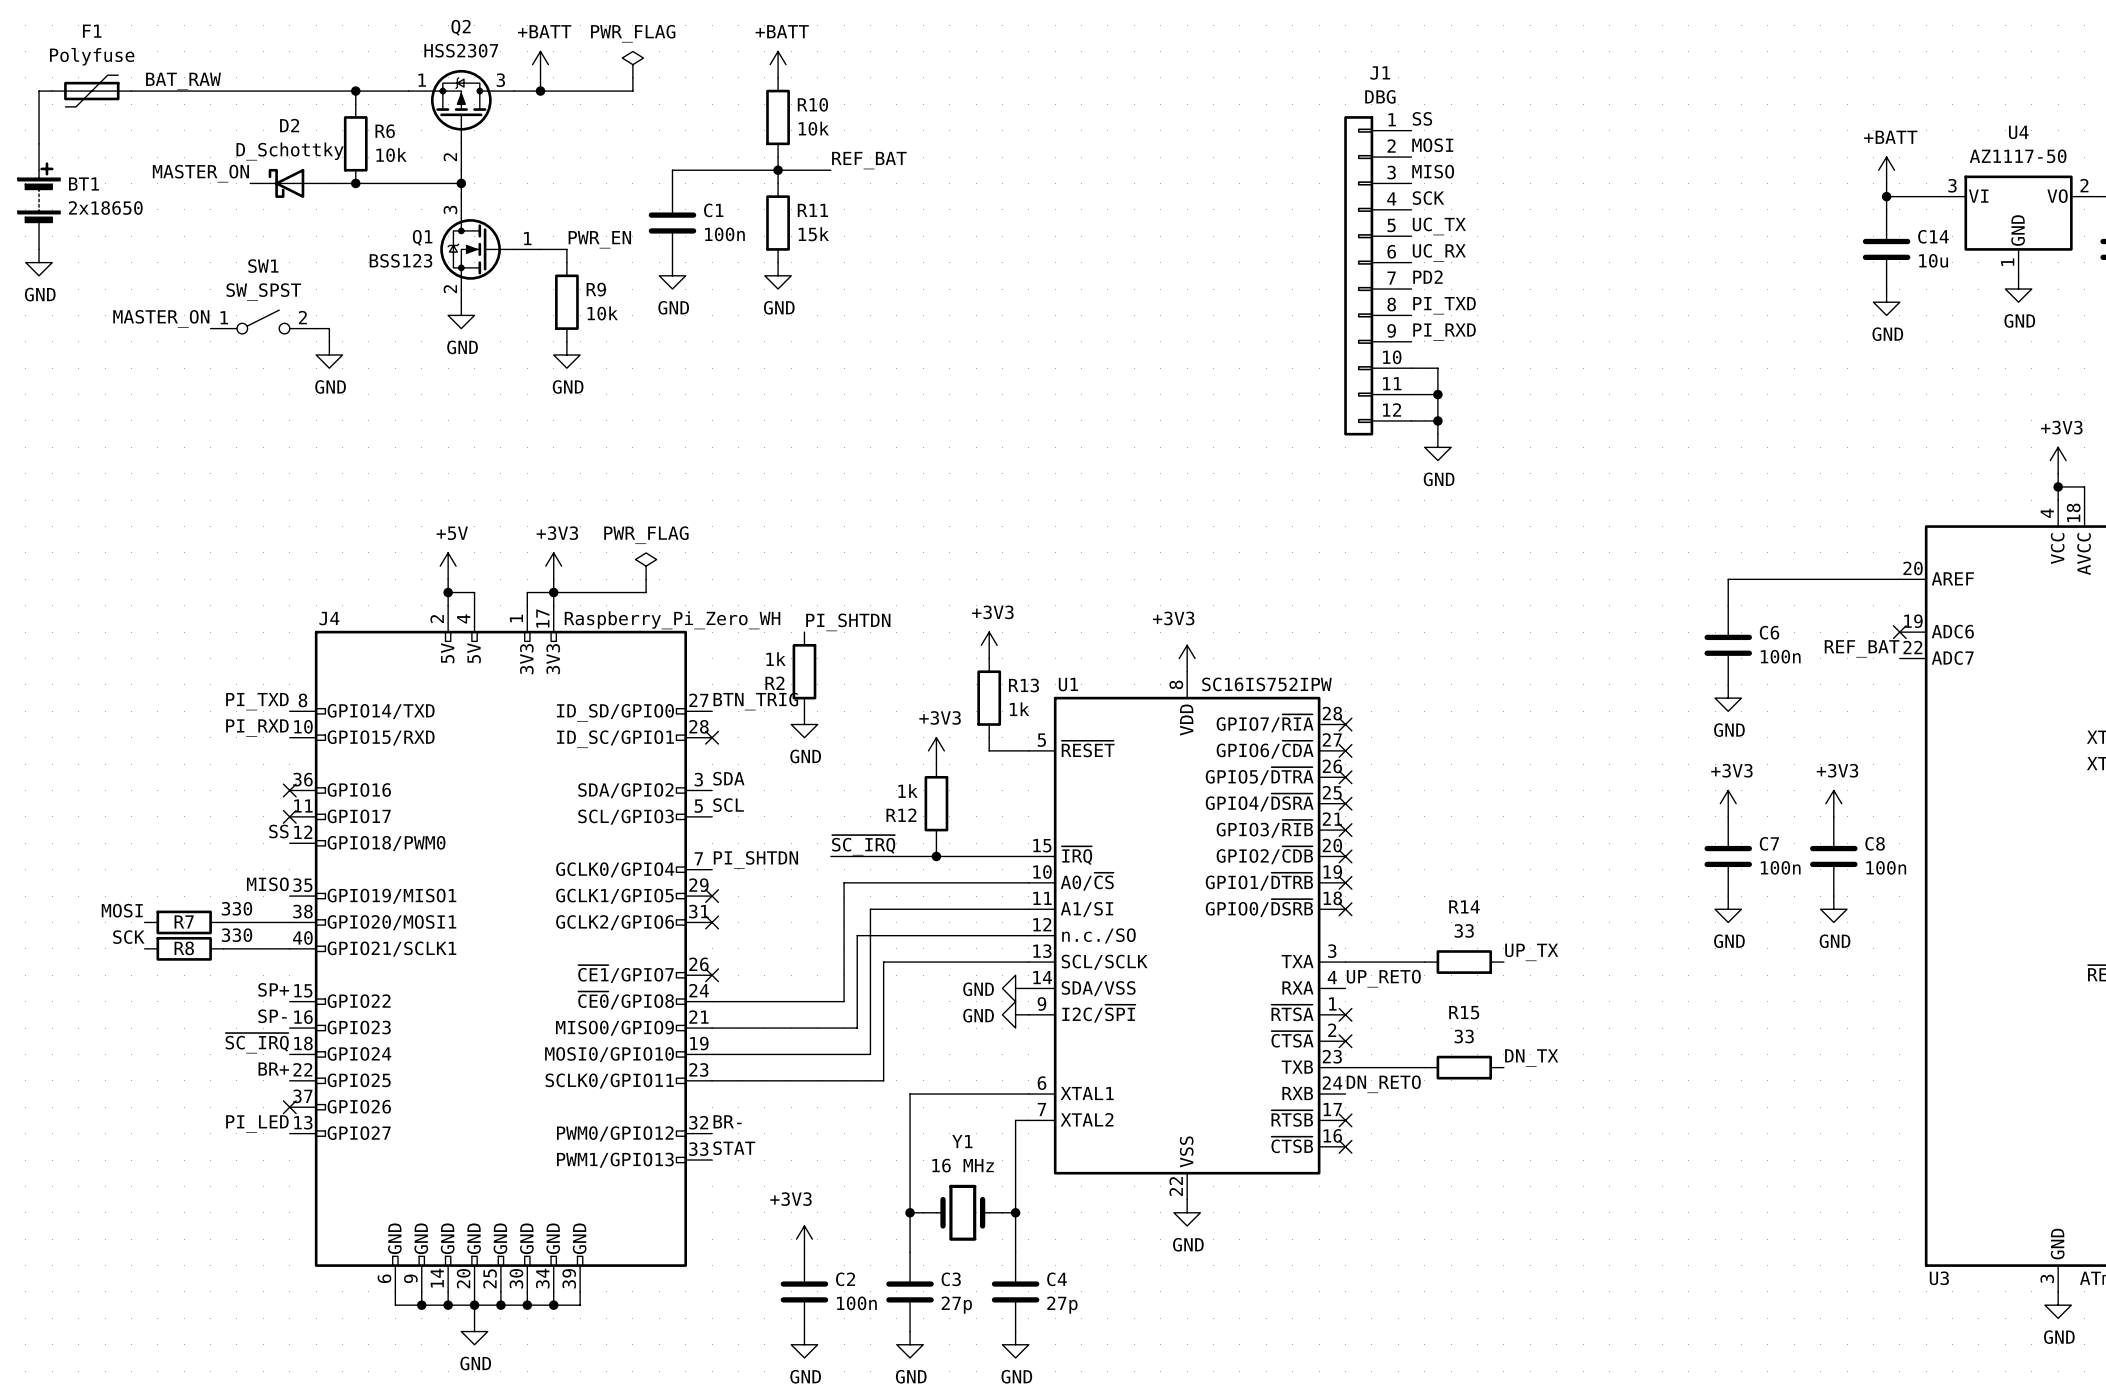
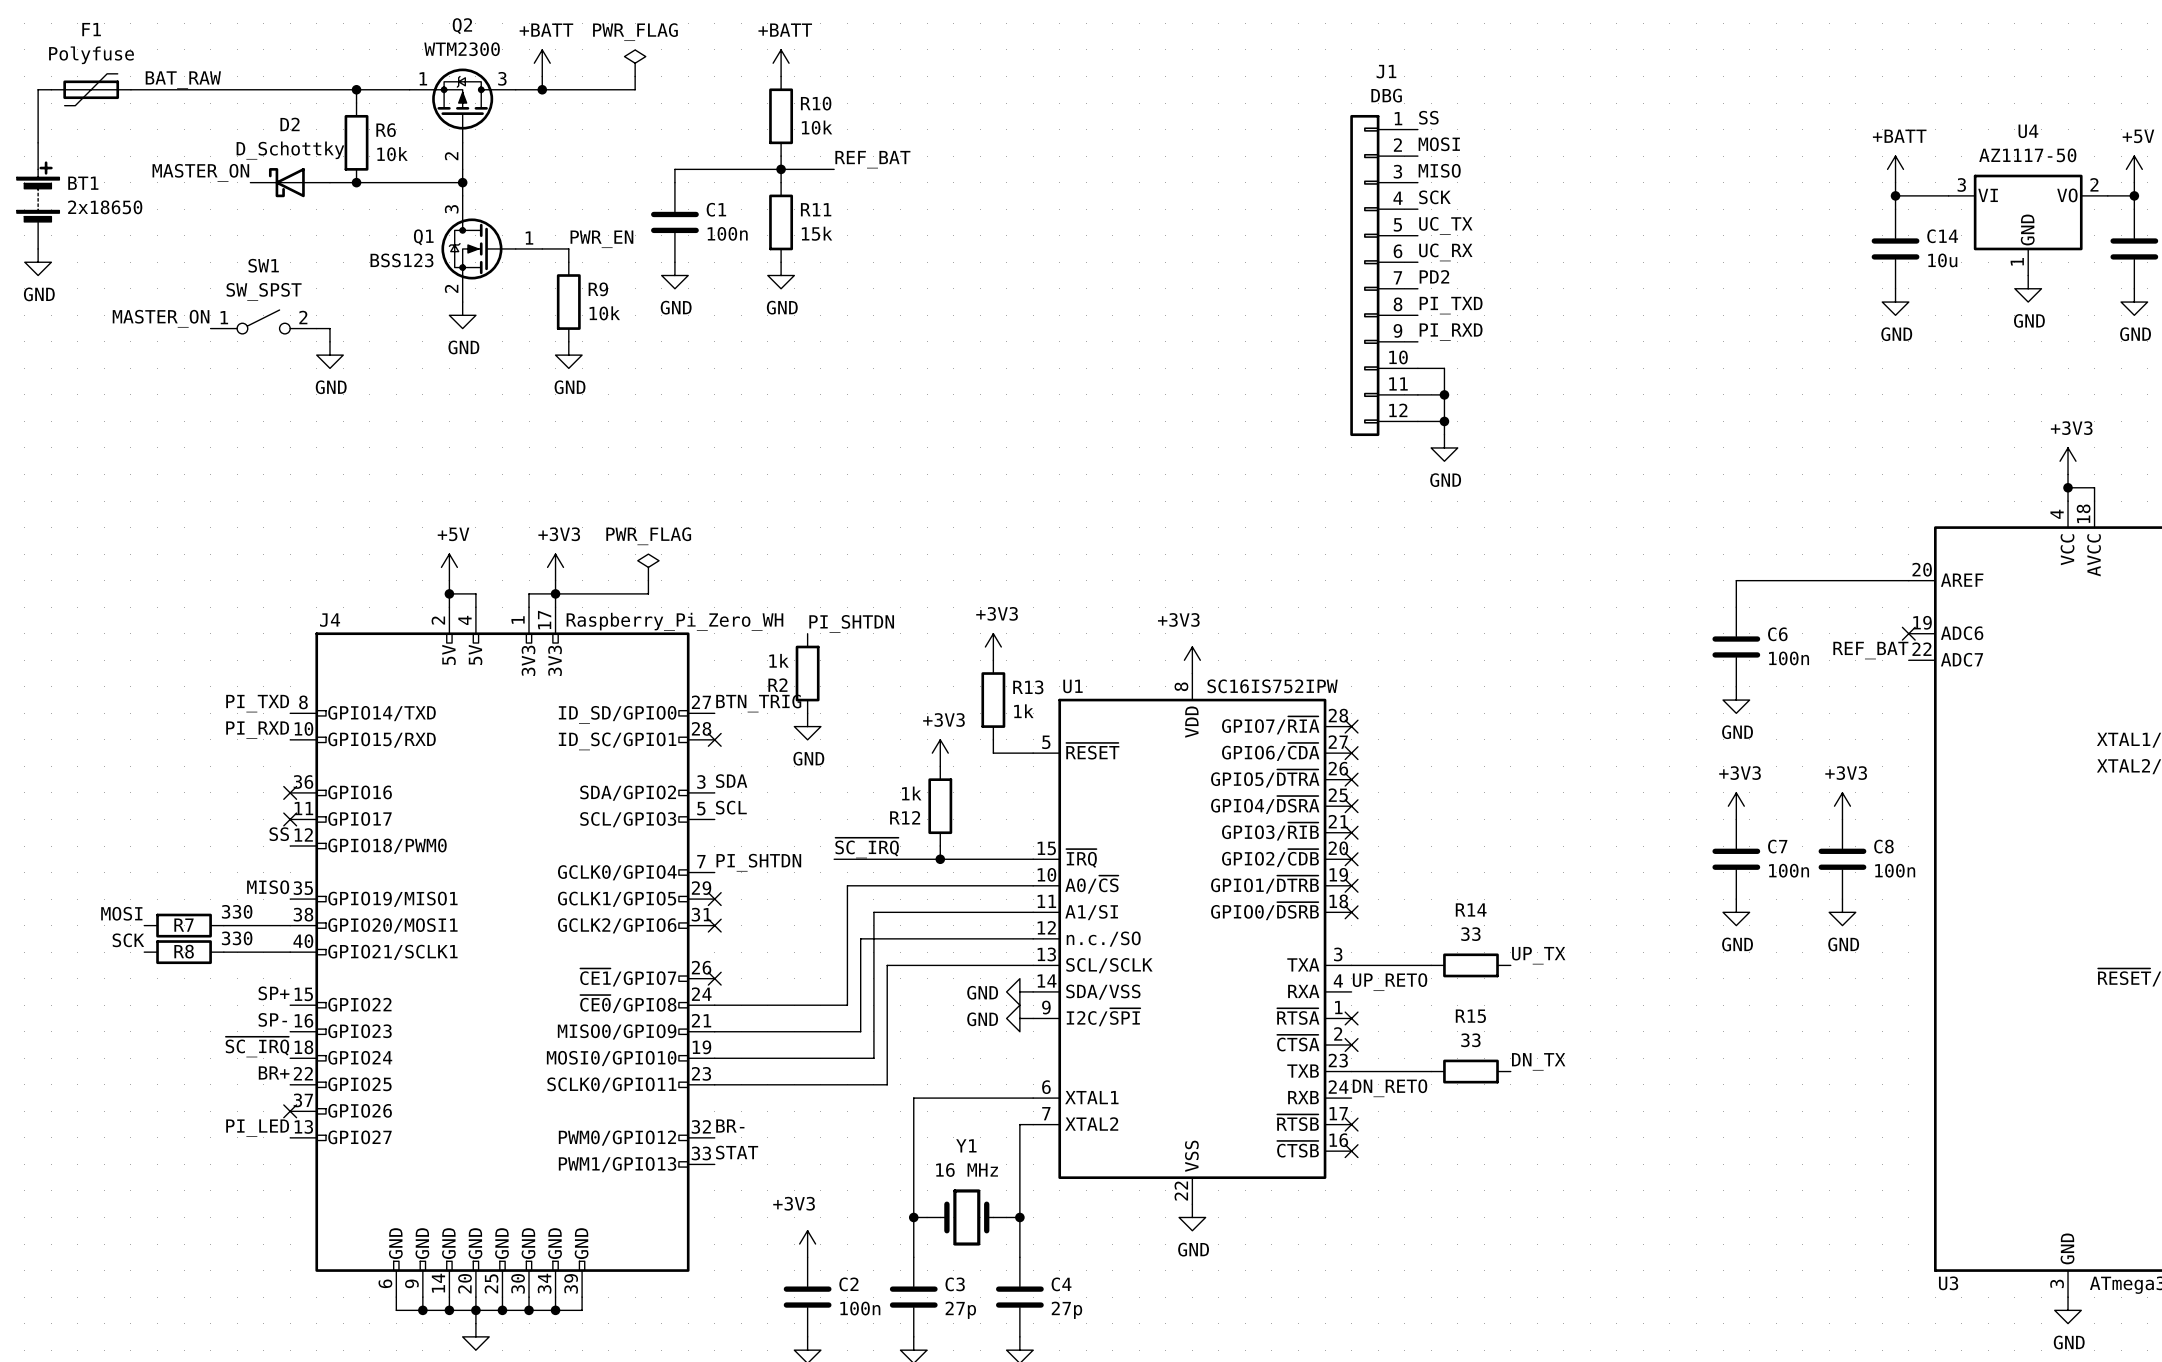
Q2 value: HSS2307 (461, 50) -> WTM2300 (462, 49)

